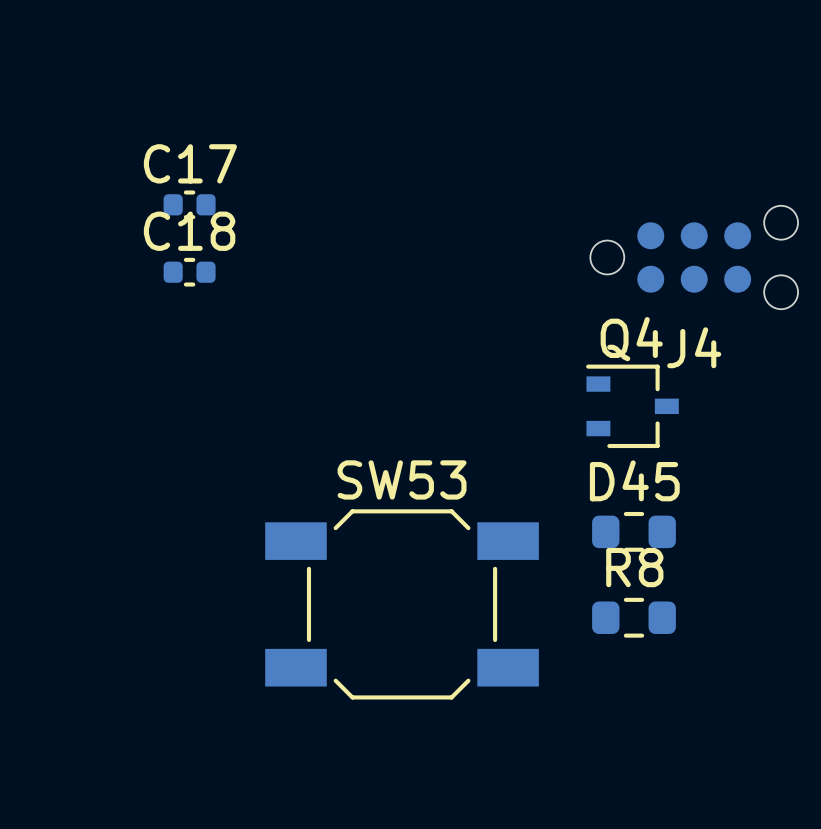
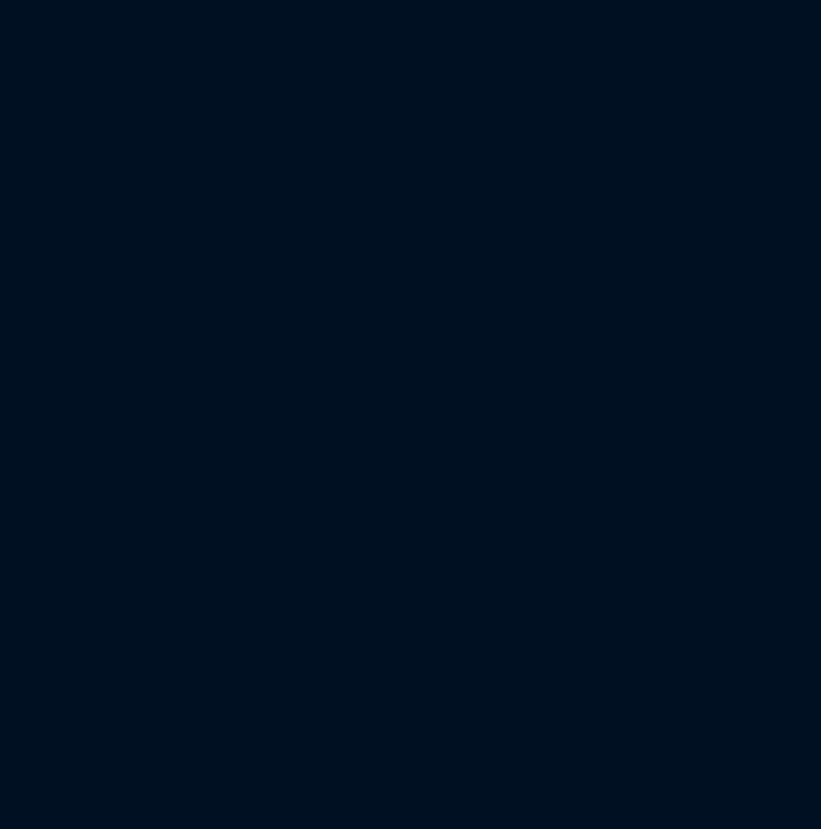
C17: (189, 204) -> none
J4: (694, 257) -> none
C18: (189, 272) -> none
Q4: (632, 406) -> none
D45: (633, 531) -> none
SW53: (402, 604) -> none
R8: (633, 617) -> none

